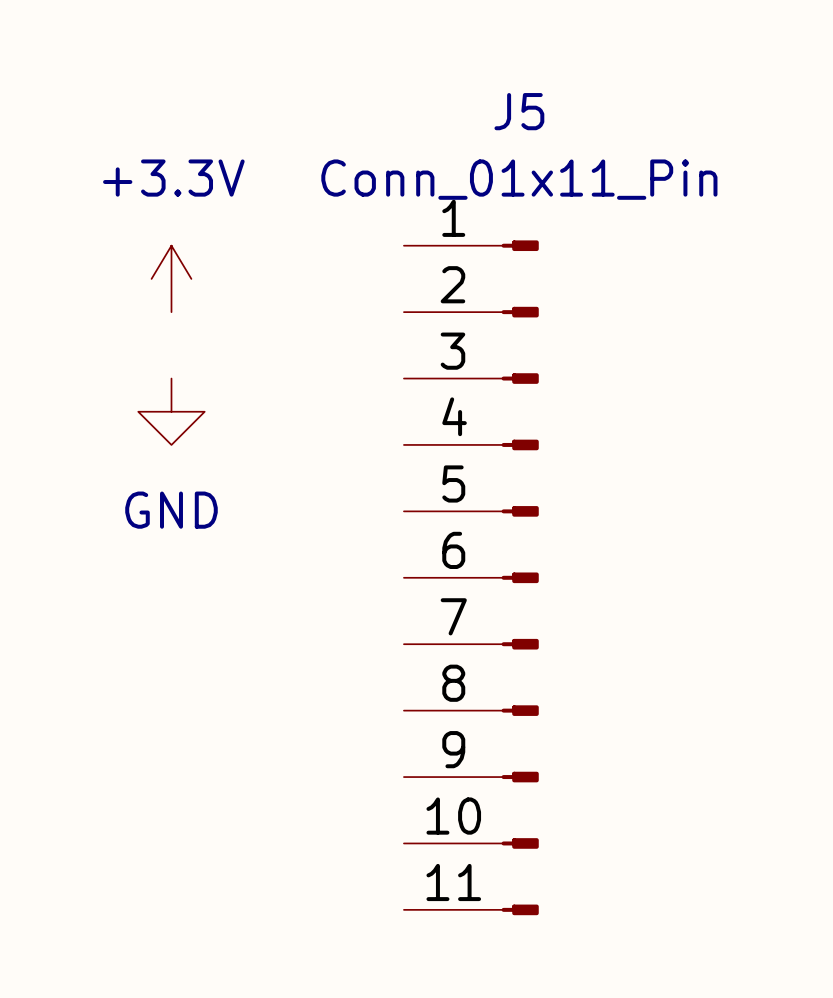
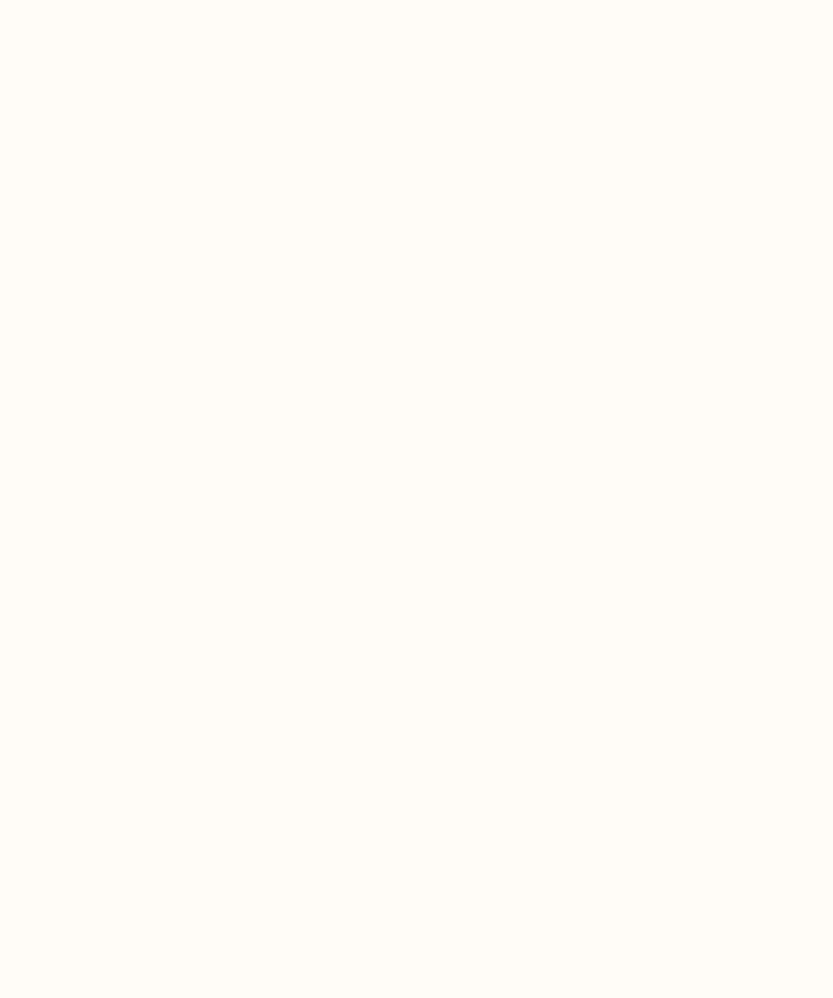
power symbol: +3.3V (171, 278) -> none
power symbol: GND (171, 411) -> none
J5: Conn_01x11_Pin (471, 577) -> none

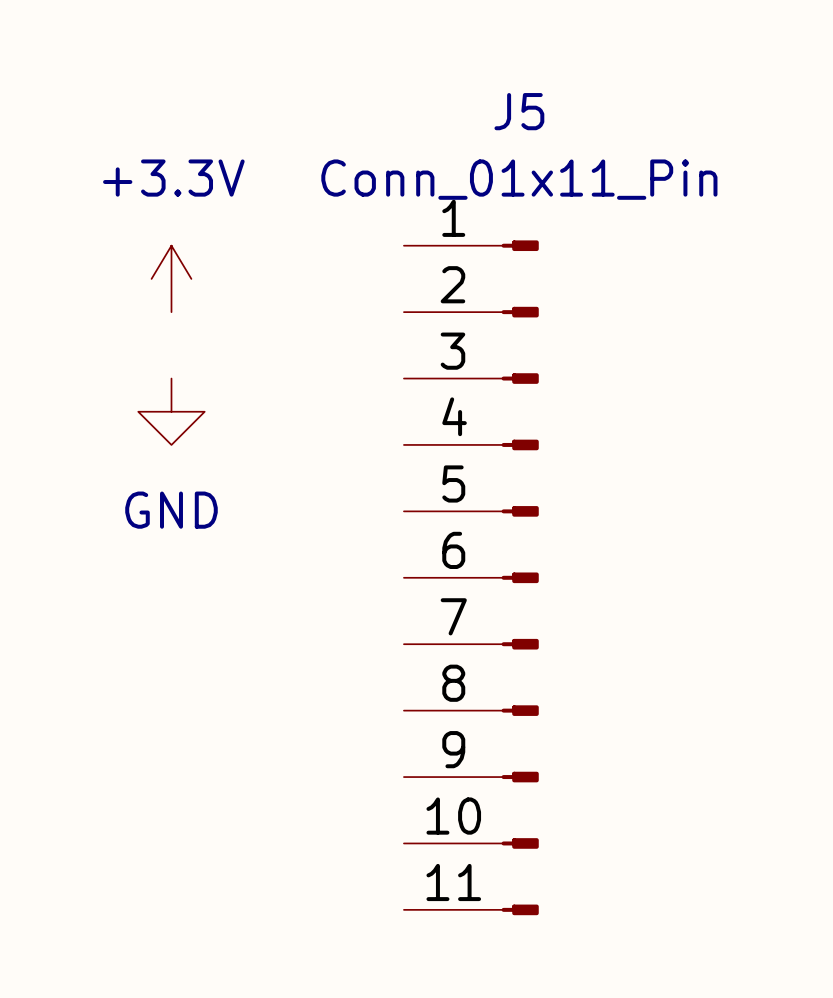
power symbol: none -> +3.3V (171, 278)
power symbol: none -> GND (171, 411)
J5: none -> Conn_01x11_Pin (471, 577)

